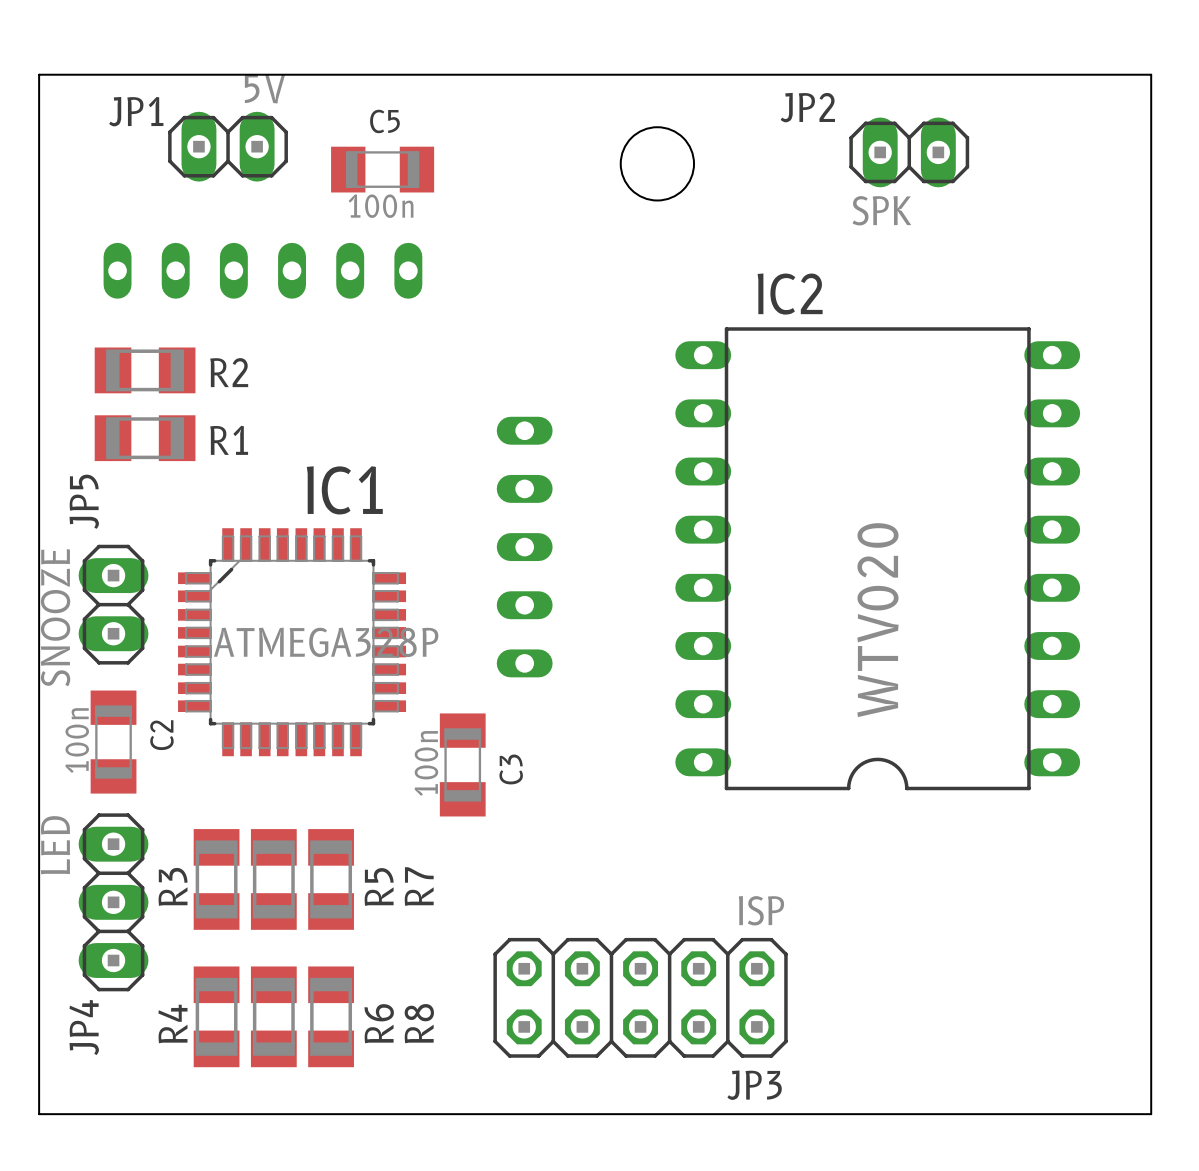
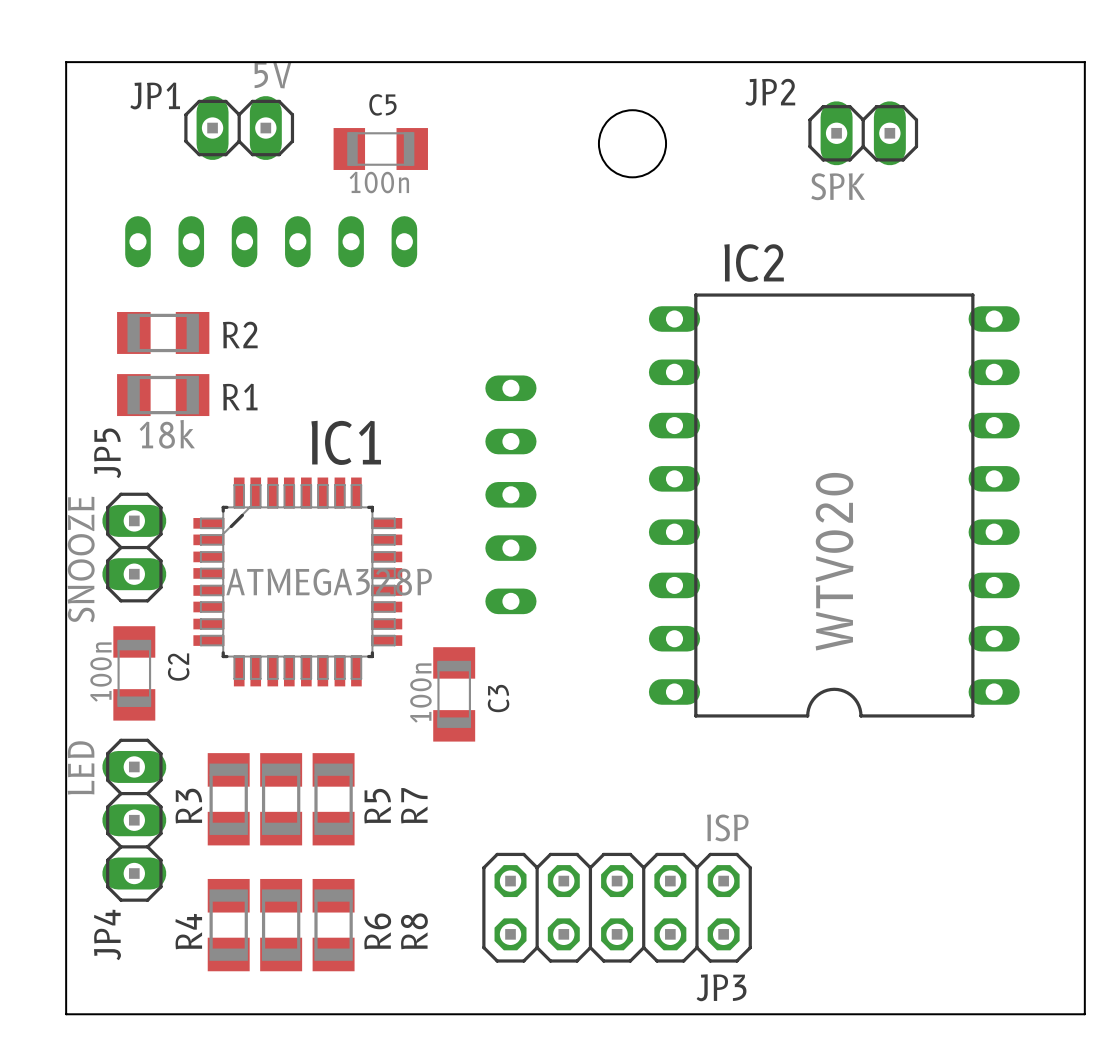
R1 value: none -> 18k (167, 434)

